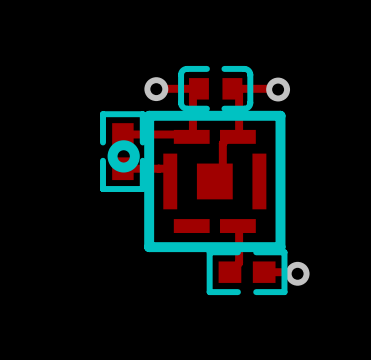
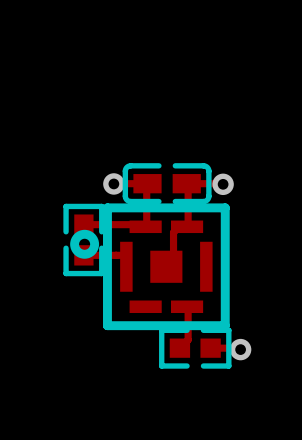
part footprint: [178, 65, 254, 112] -> [122, 163, 212, 205]

